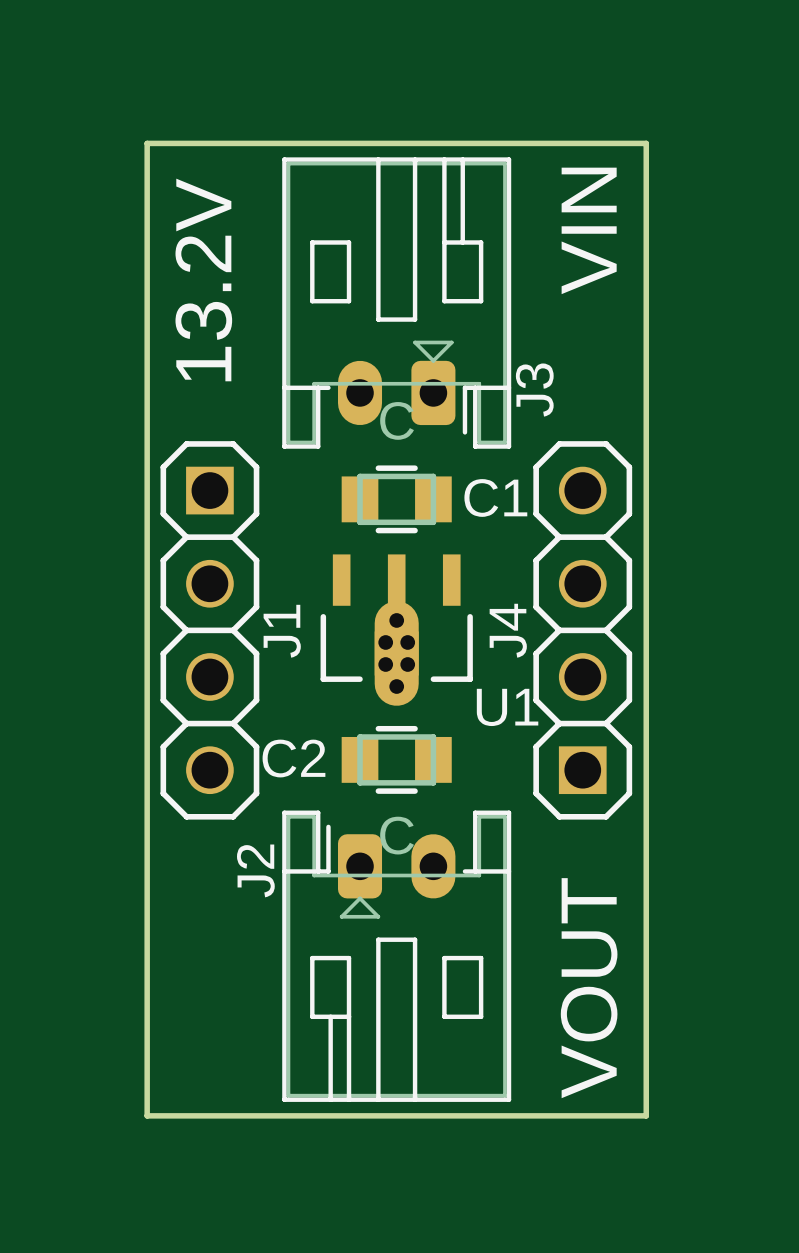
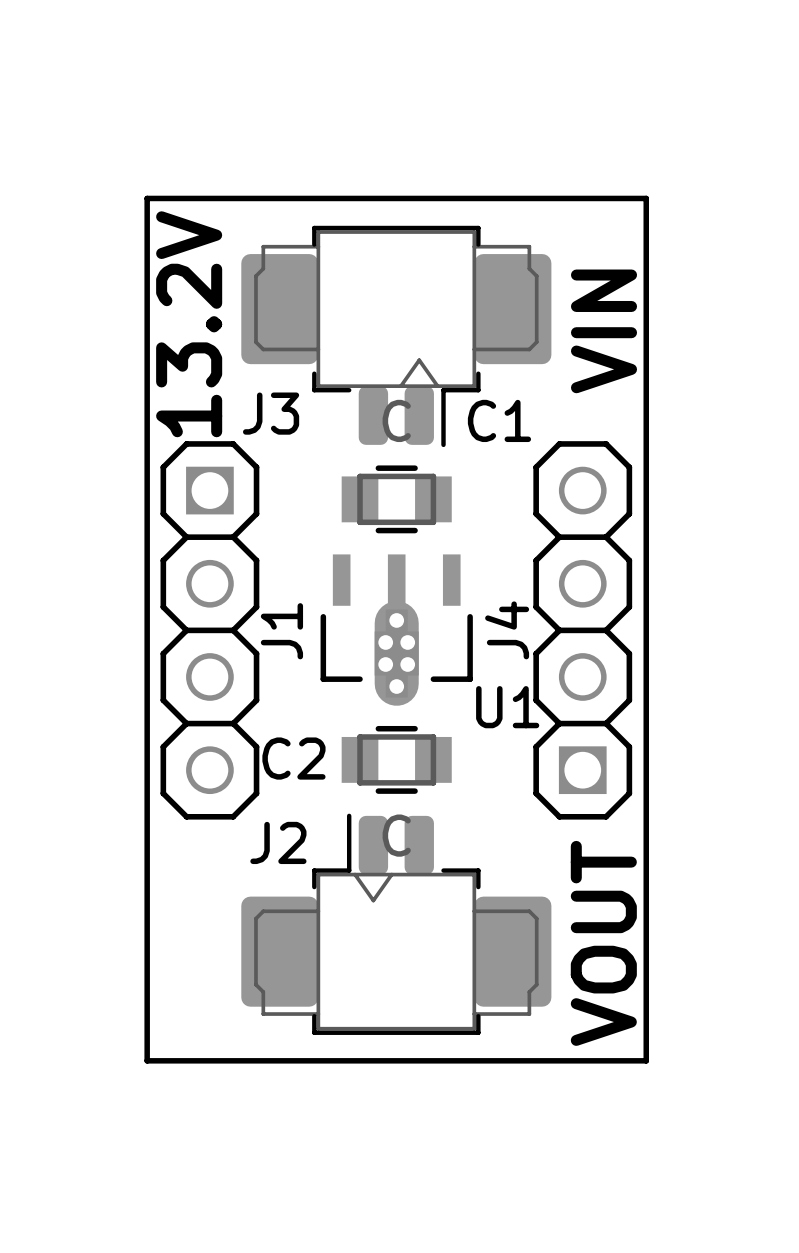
J3 footprint: [282, 157, 512, 449] -> [241, 225, 552, 448]
board edge: (147, 198) (147, 143) (646, 143) (646, 198) -> (147, 198) (646, 198)
text position: VIN (589, 230) -> VIN (604, 331)
text position: 13.2V (203, 279) -> 13.2V (189, 324)
J3 name position: J3 (534, 390) -> J3 (271, 413)
C1 name position: C1 (495, 497) -> C1 (499, 420)
J2 footprint: [282, 810, 512, 1102] -> [241, 813, 552, 1035]
text position: VOUT (589, 988) -> VOUT (603, 943)
board edge: (147, 1060) (147, 1115) (646, 1115) (646, 1060) -> (147, 1060) (646, 1060)

